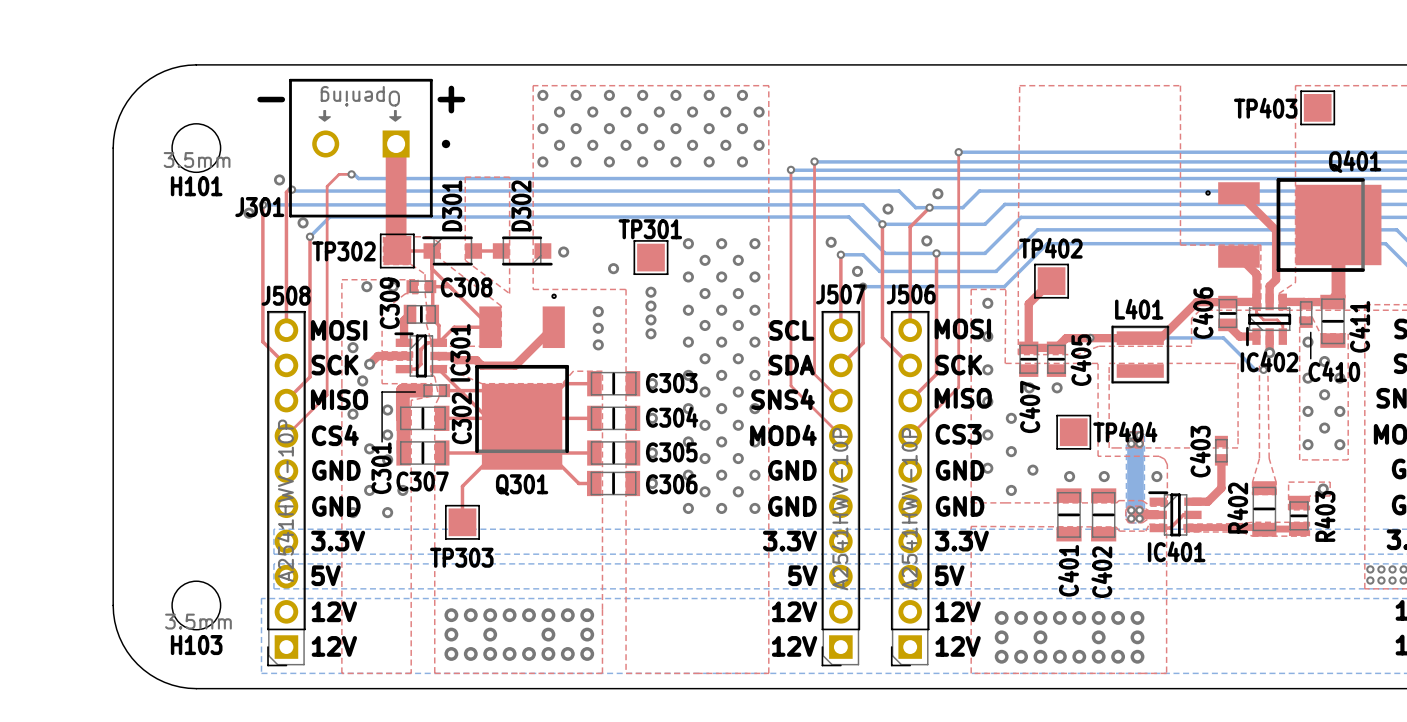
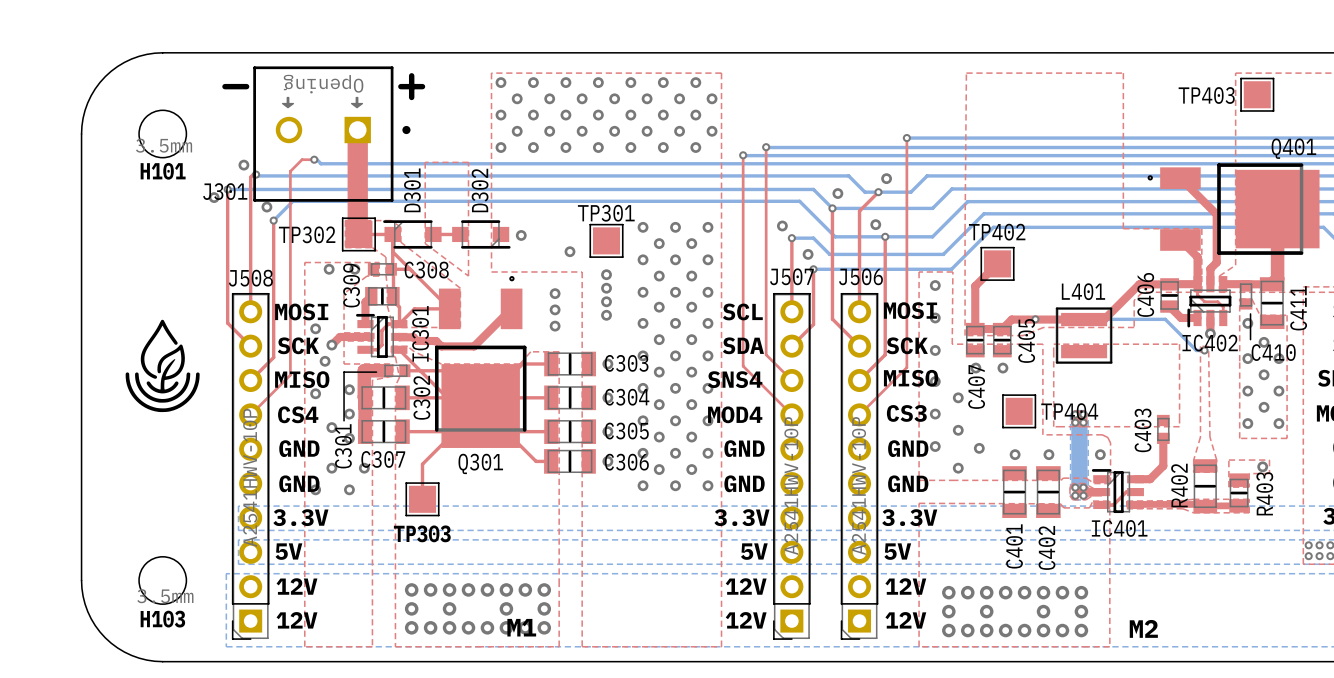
drawing: none -> [125, 319, 200, 413]
text: none -> M1 (521, 627)
text: none -> M2 (1143, 628)

